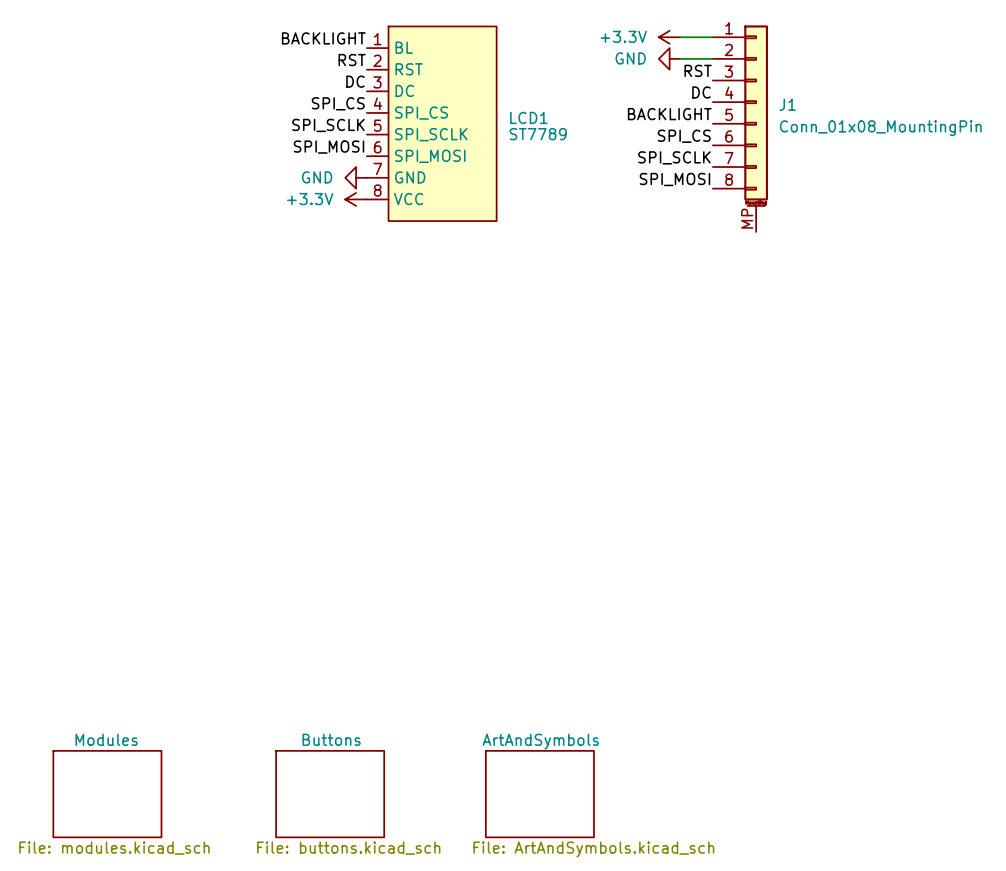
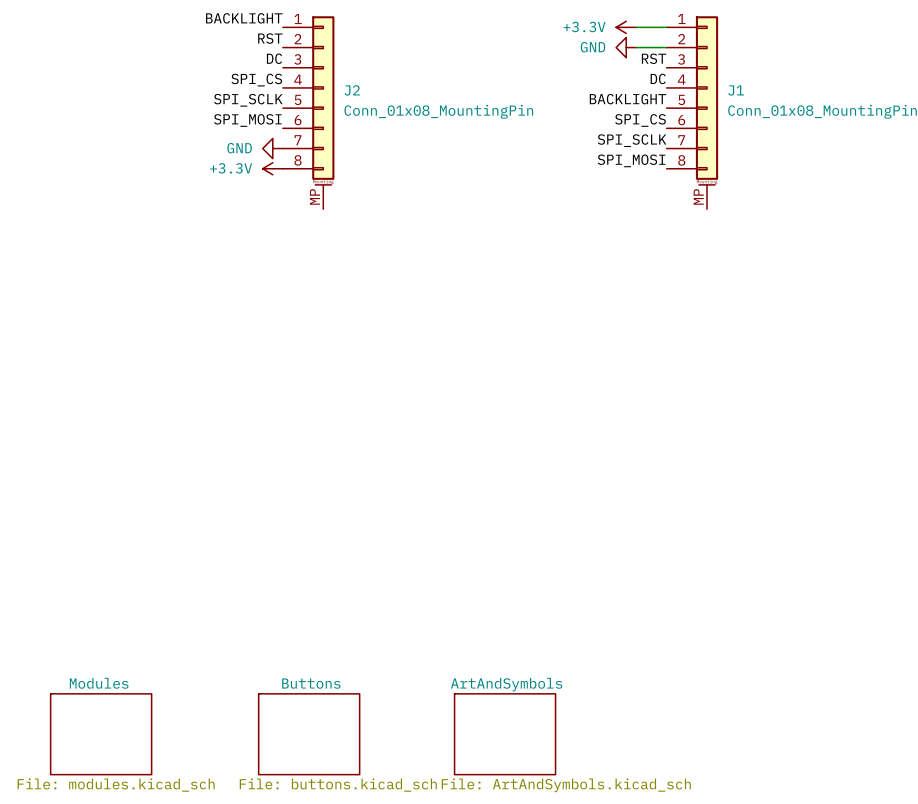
label position: BACKLIGHT (323, 38) -> BACKLIGHT (244, 18)
label position: RST (352, 60) -> RST (270, 38)
label position: DC (355, 81) -> DC (274, 58)
label position: SPI_CS (338, 103) -> SPI_CS (256, 80)
LCD1: ST7789 (431, 123) -> none
label position: SPI_SCLK (328, 125) -> SPI_SCLK (248, 100)
J2: none -> Conn_01x08_MountingPin (308, 112)
label position: SPI_MOSI (328, 147) -> SPI_MOSI (247, 120)
power symbol position: GND (356, 177) -> GND (272, 148)
power symbol position: +3.3V (356, 199) -> +3.3V (272, 168)

